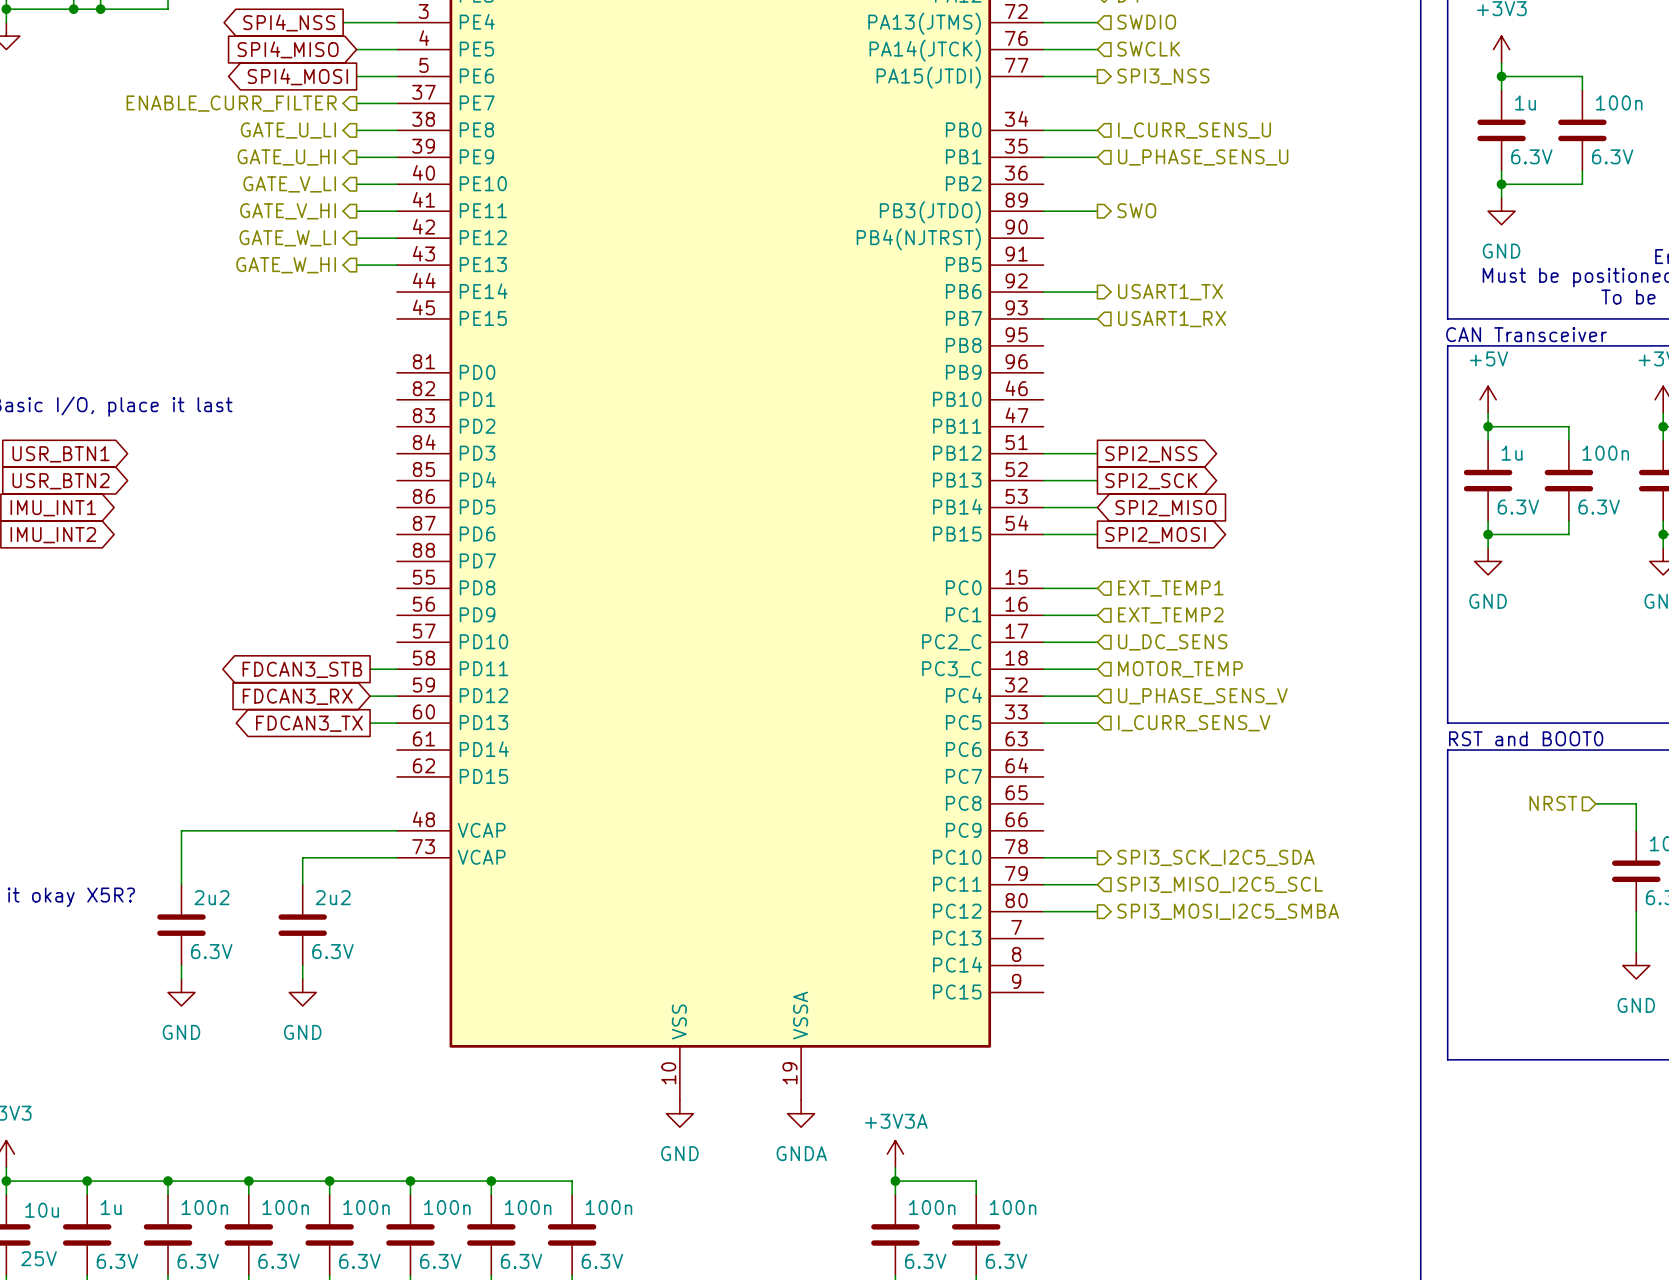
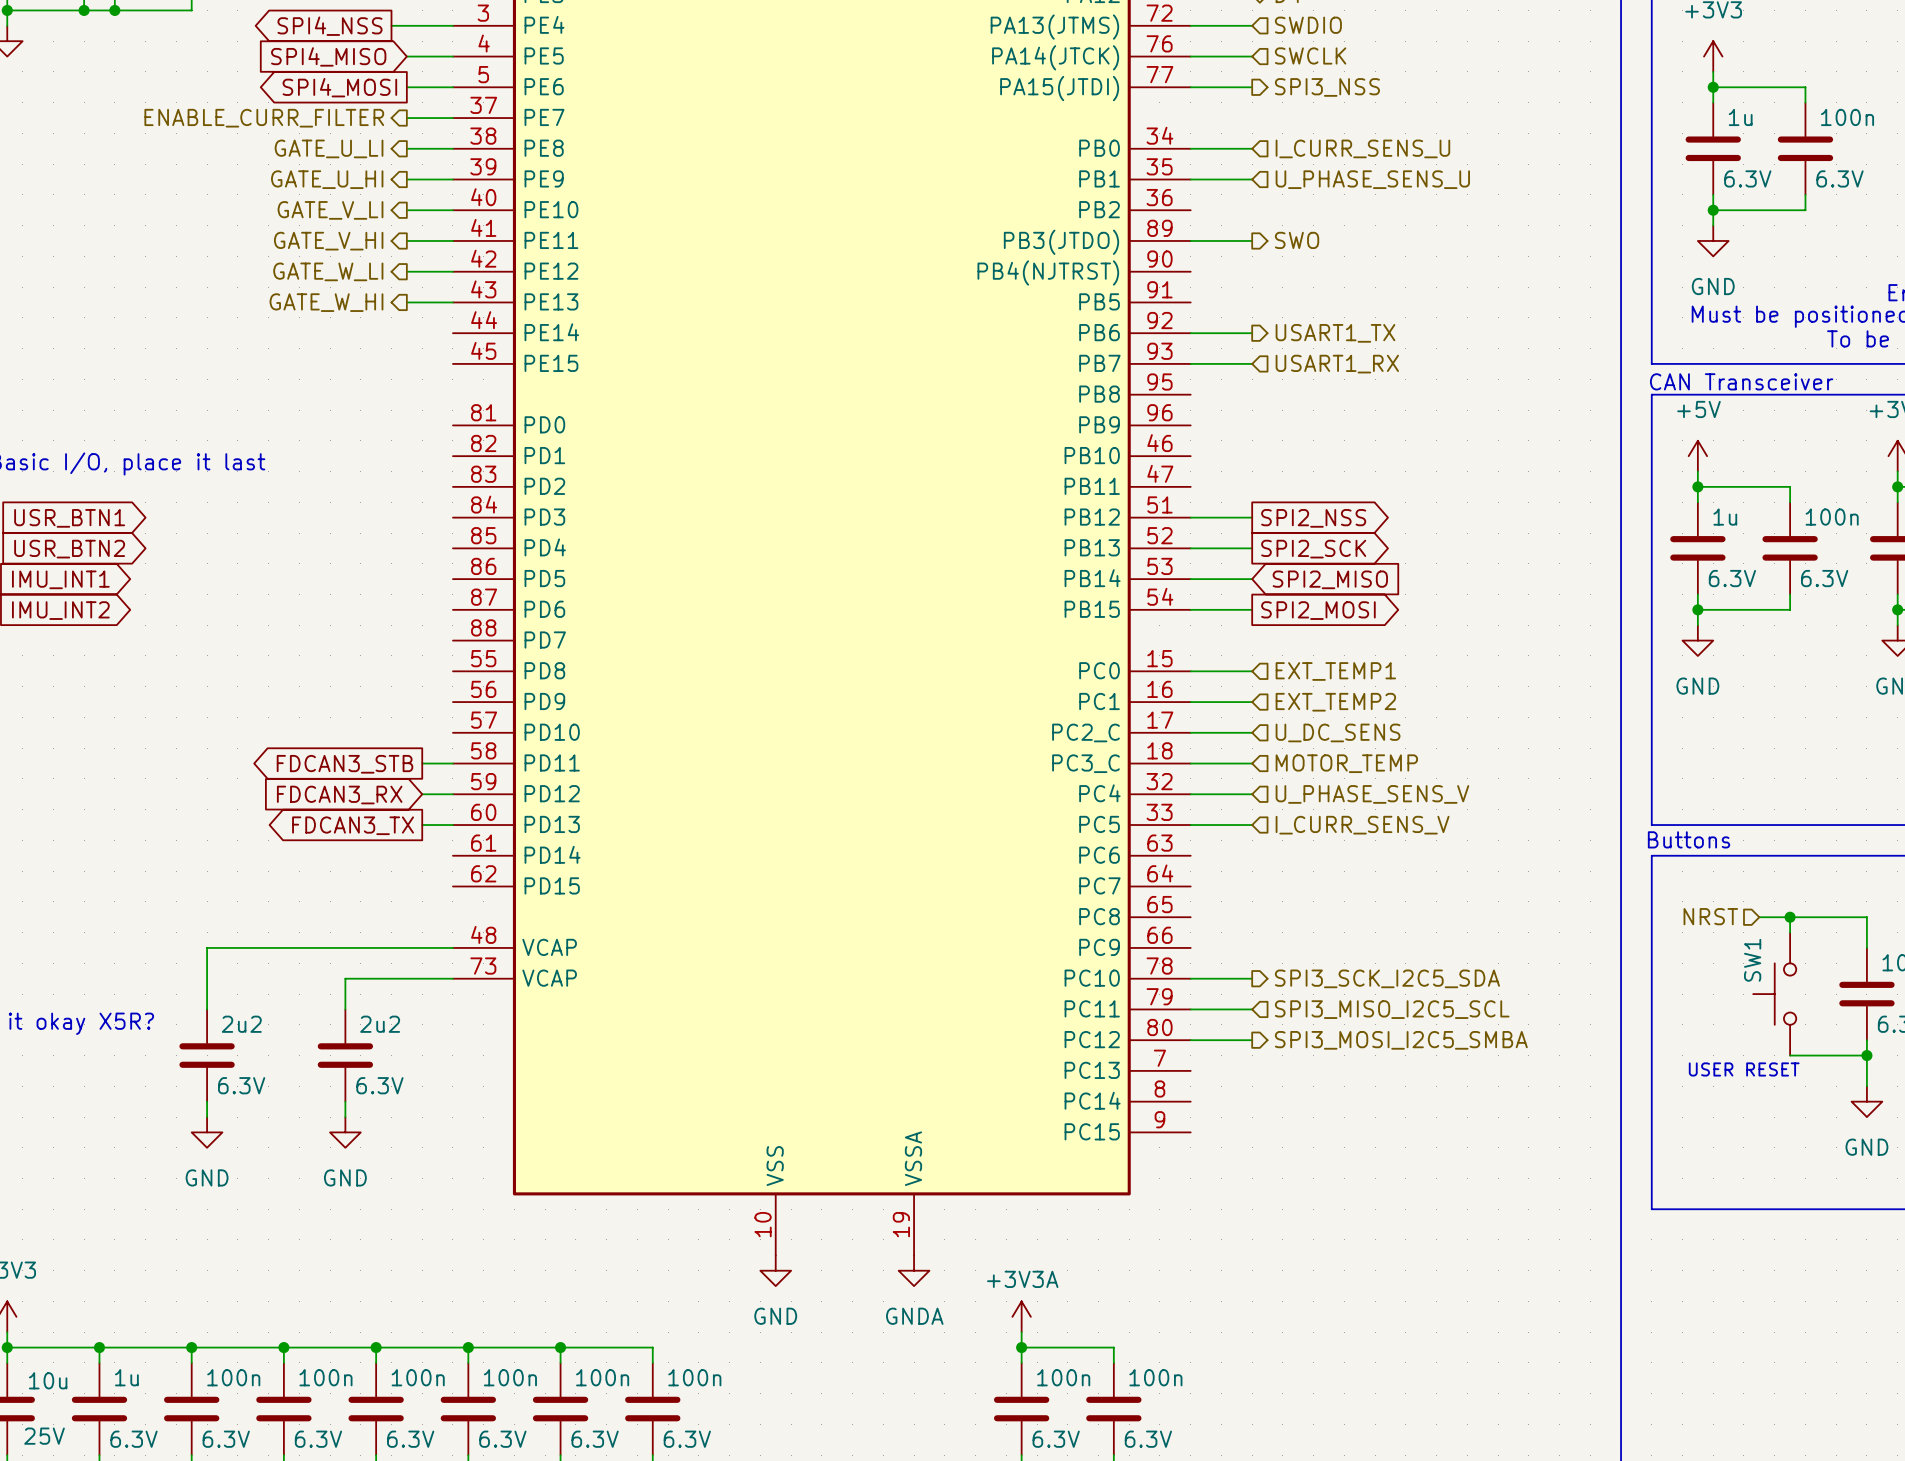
text: none -> Buttons (1689, 839)
text: RST and BOOT0 (1526, 738) -> none
wire: none -> (1759, 917) (1820, 917)
hierarchical label position: NRST (1553, 803) -> NRST (1710, 916)
wire: none -> (1790, 917) (1790, 932)
junction: none -> (1790, 917)
SW1: none -> (1774, 994)
wire: none -> (1790, 1055) (1866, 1055)
junction: none -> (1866, 1055)
text: none -> USER RESET (1744, 1069)

